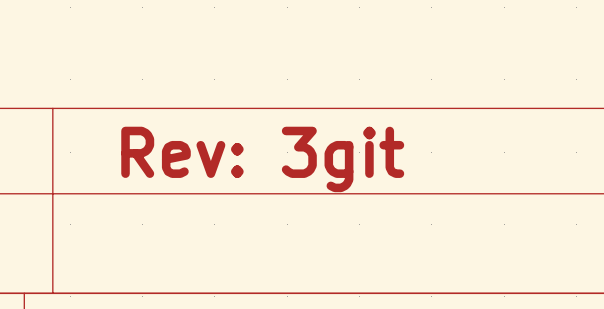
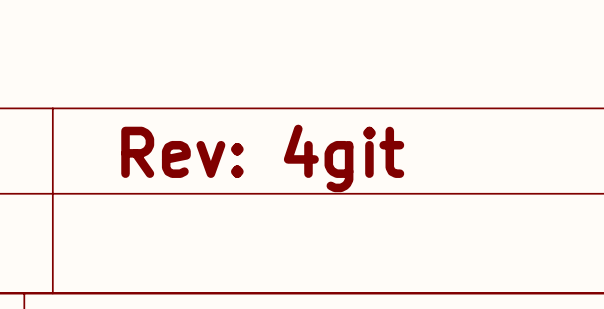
title block: Rev: 3git (262, 159) -> Rev: 4git (262, 158)

